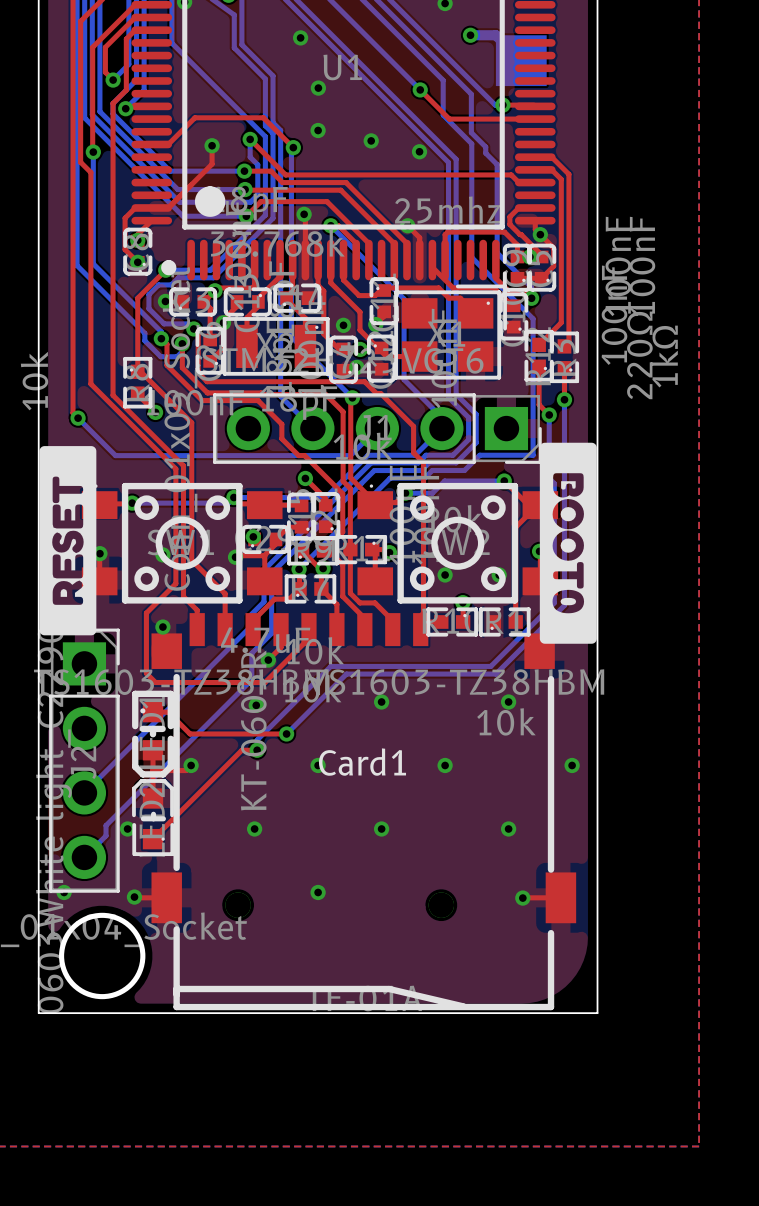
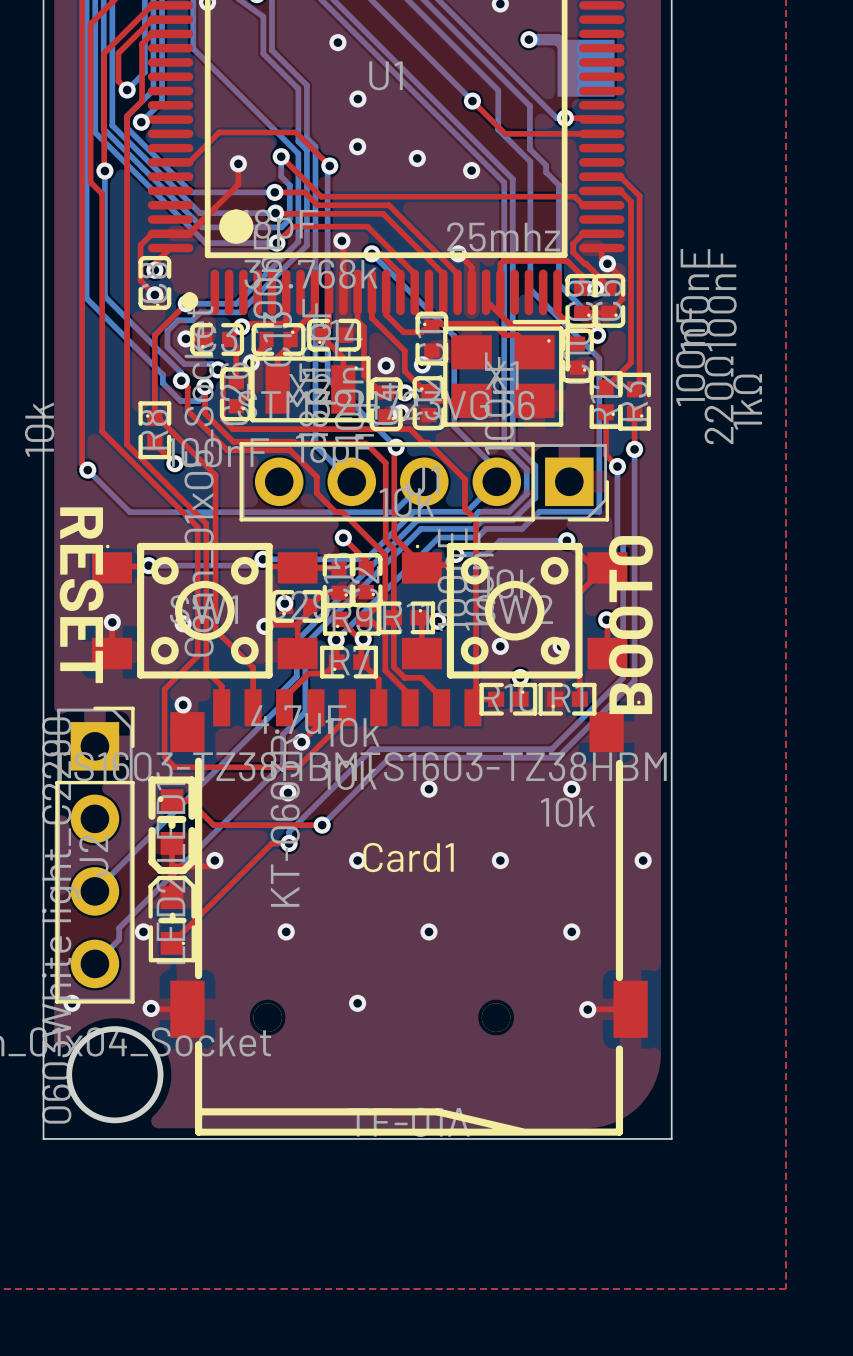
drawing: [539, 442, 597, 644] -> none
drawing: [39, 446, 97, 636] -> none
text: none -> RESET (81, 595)
text: none -> BOOT0 (630, 625)

